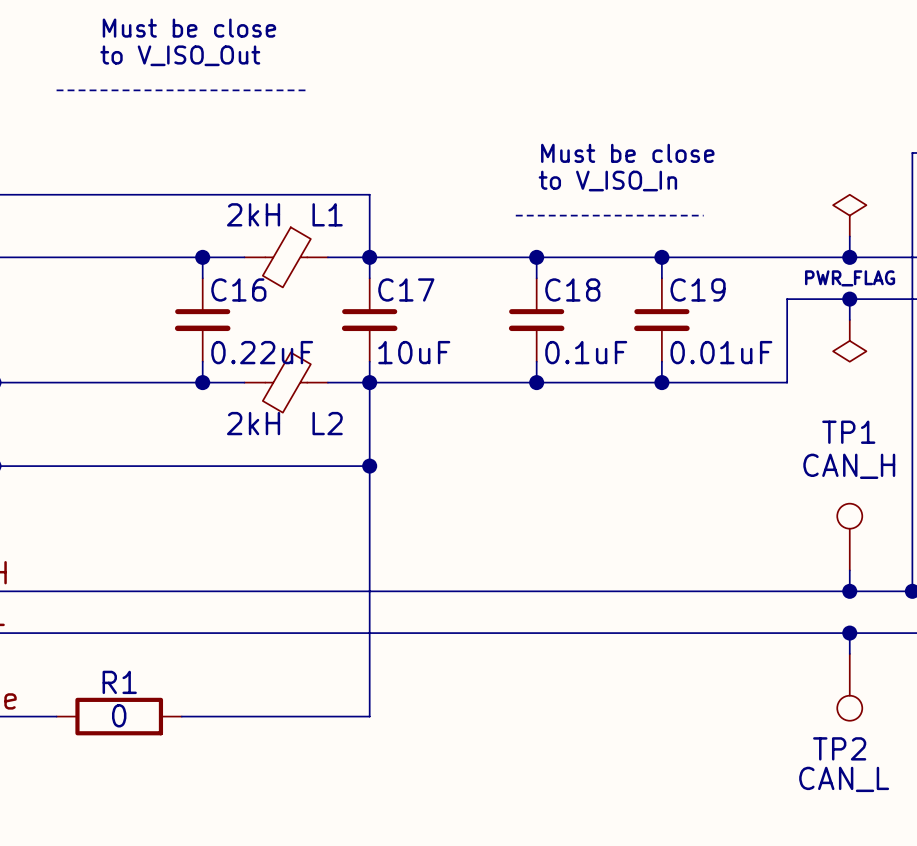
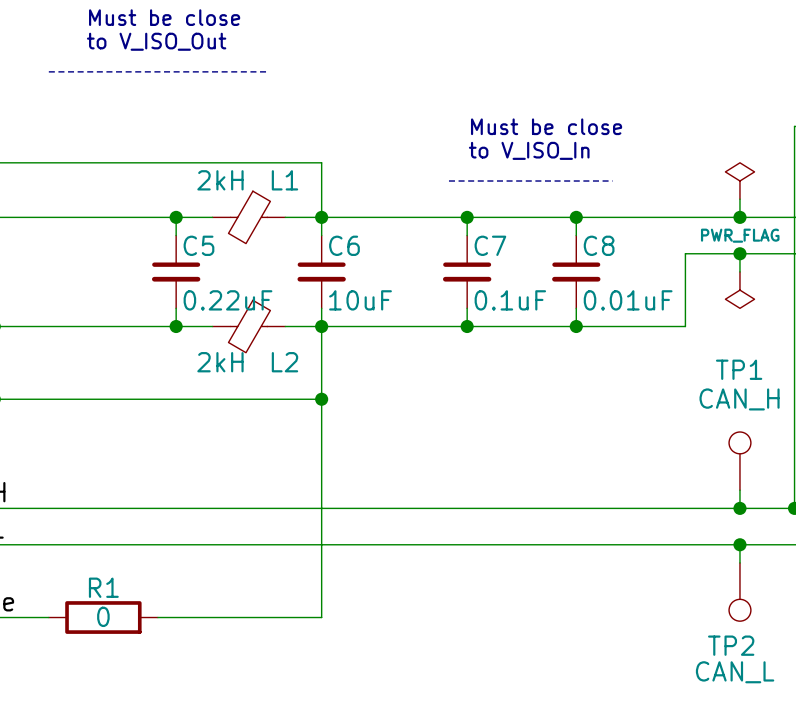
C16 name: C16 (238, 289) -> C5 (198, 245)
C17 name: C17 (406, 289) -> C6 (344, 245)
C18 name: C18 (572, 289) -> C7 (490, 245)
C19 name: C19 (698, 289) -> C8 (599, 245)

